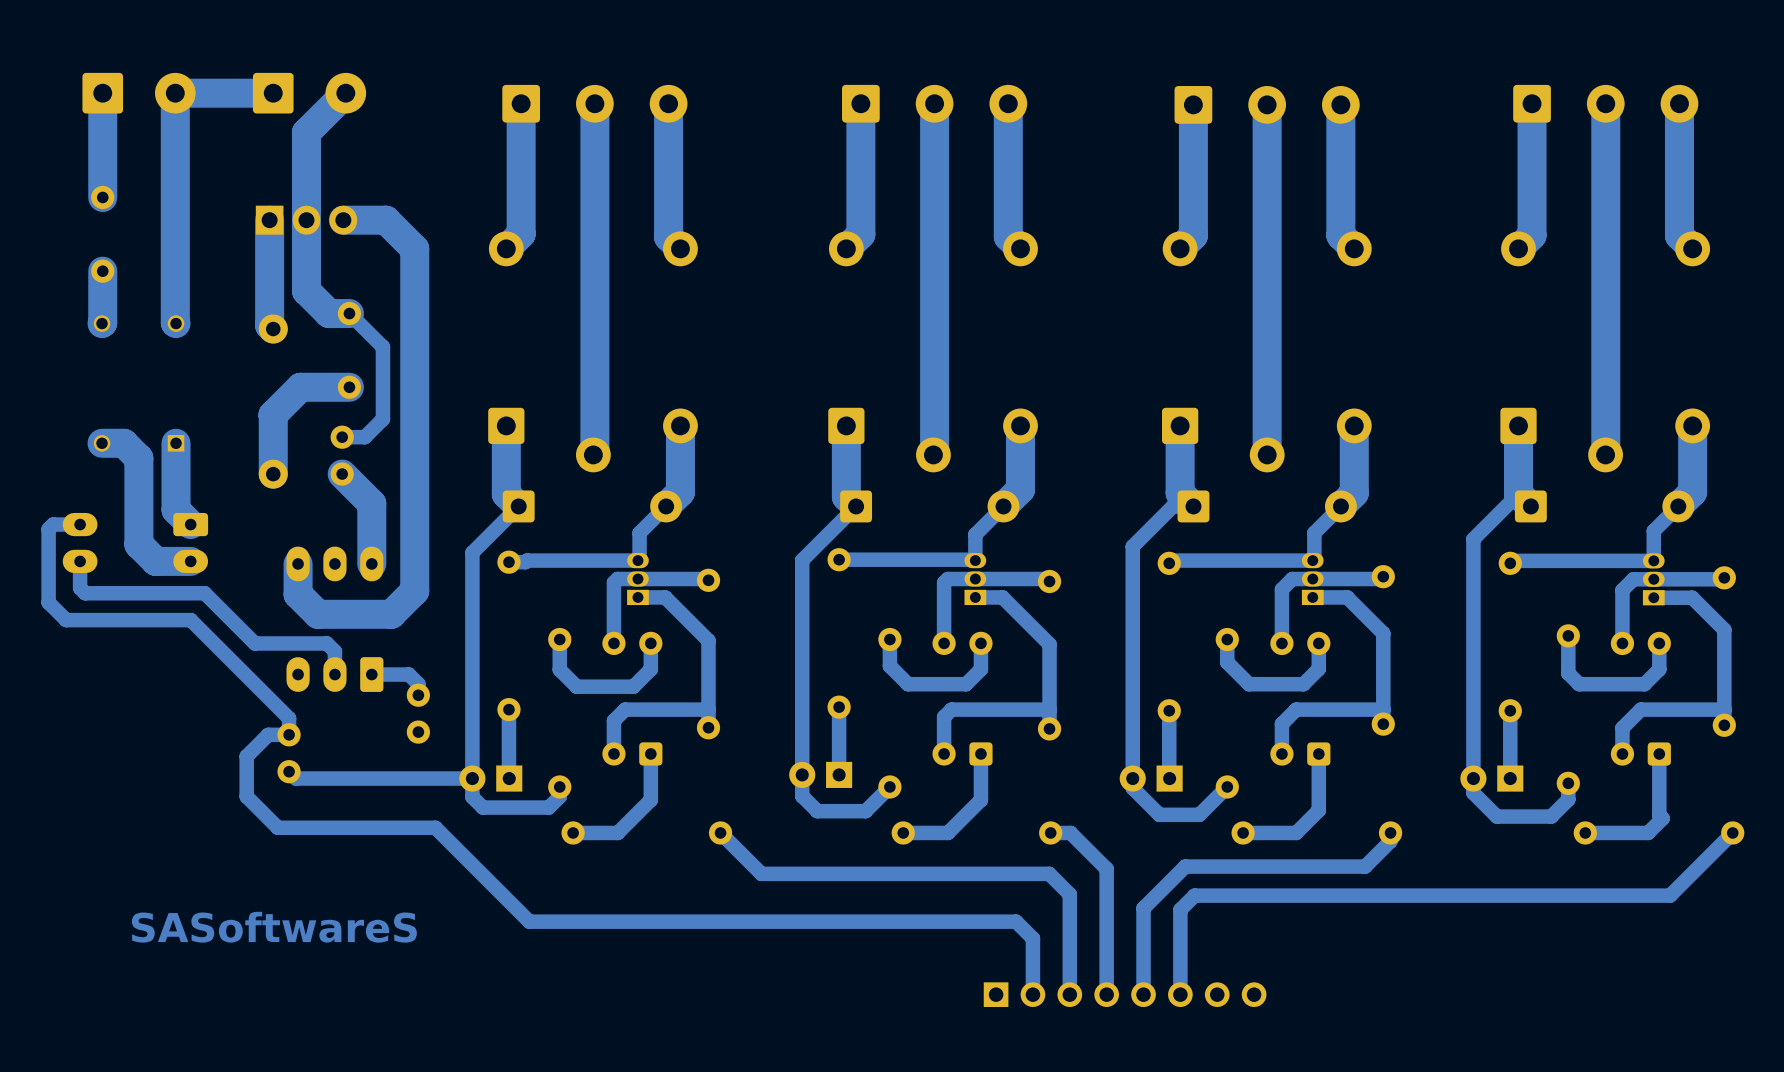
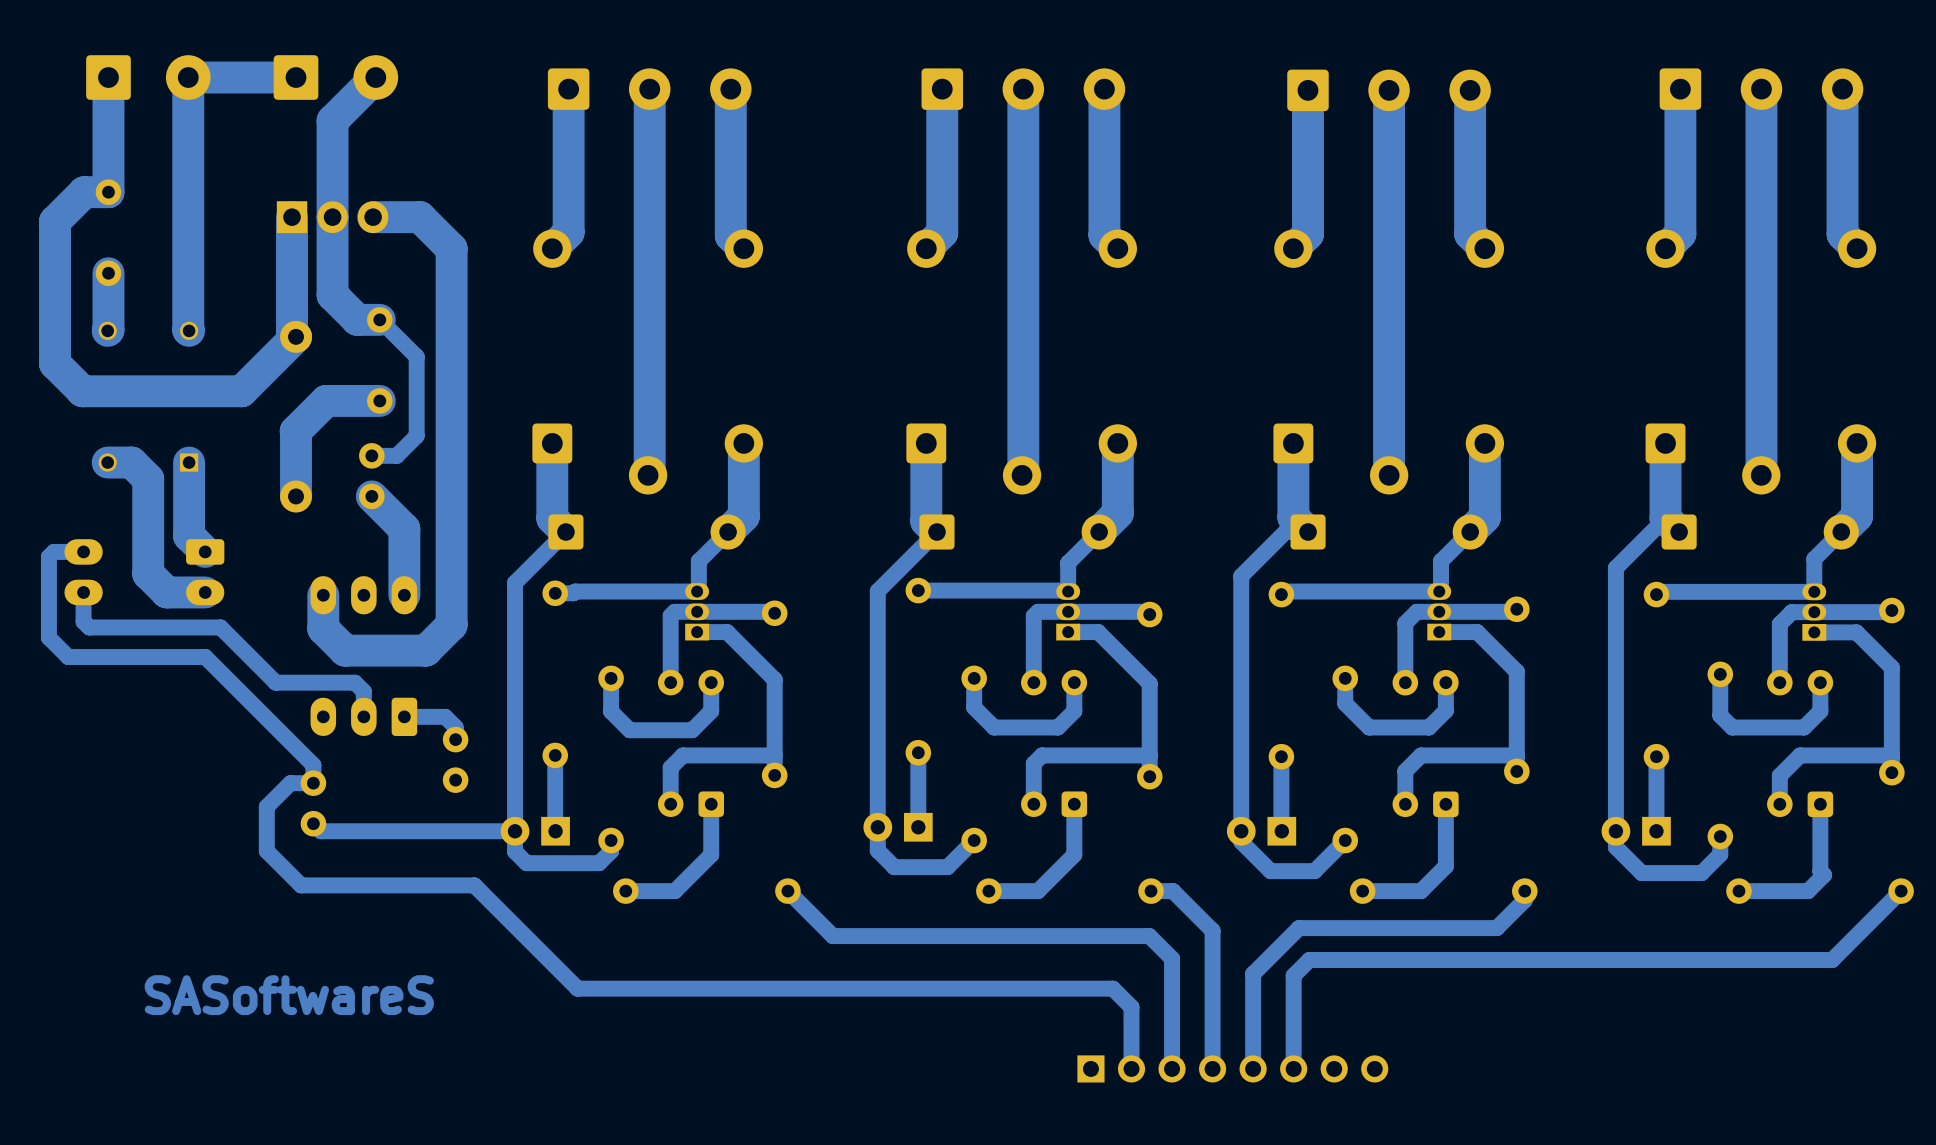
track: none -> (108, 192) (84, 192) (55, 221) (55, 363) (82, 391) (241, 391) (296, 336)

